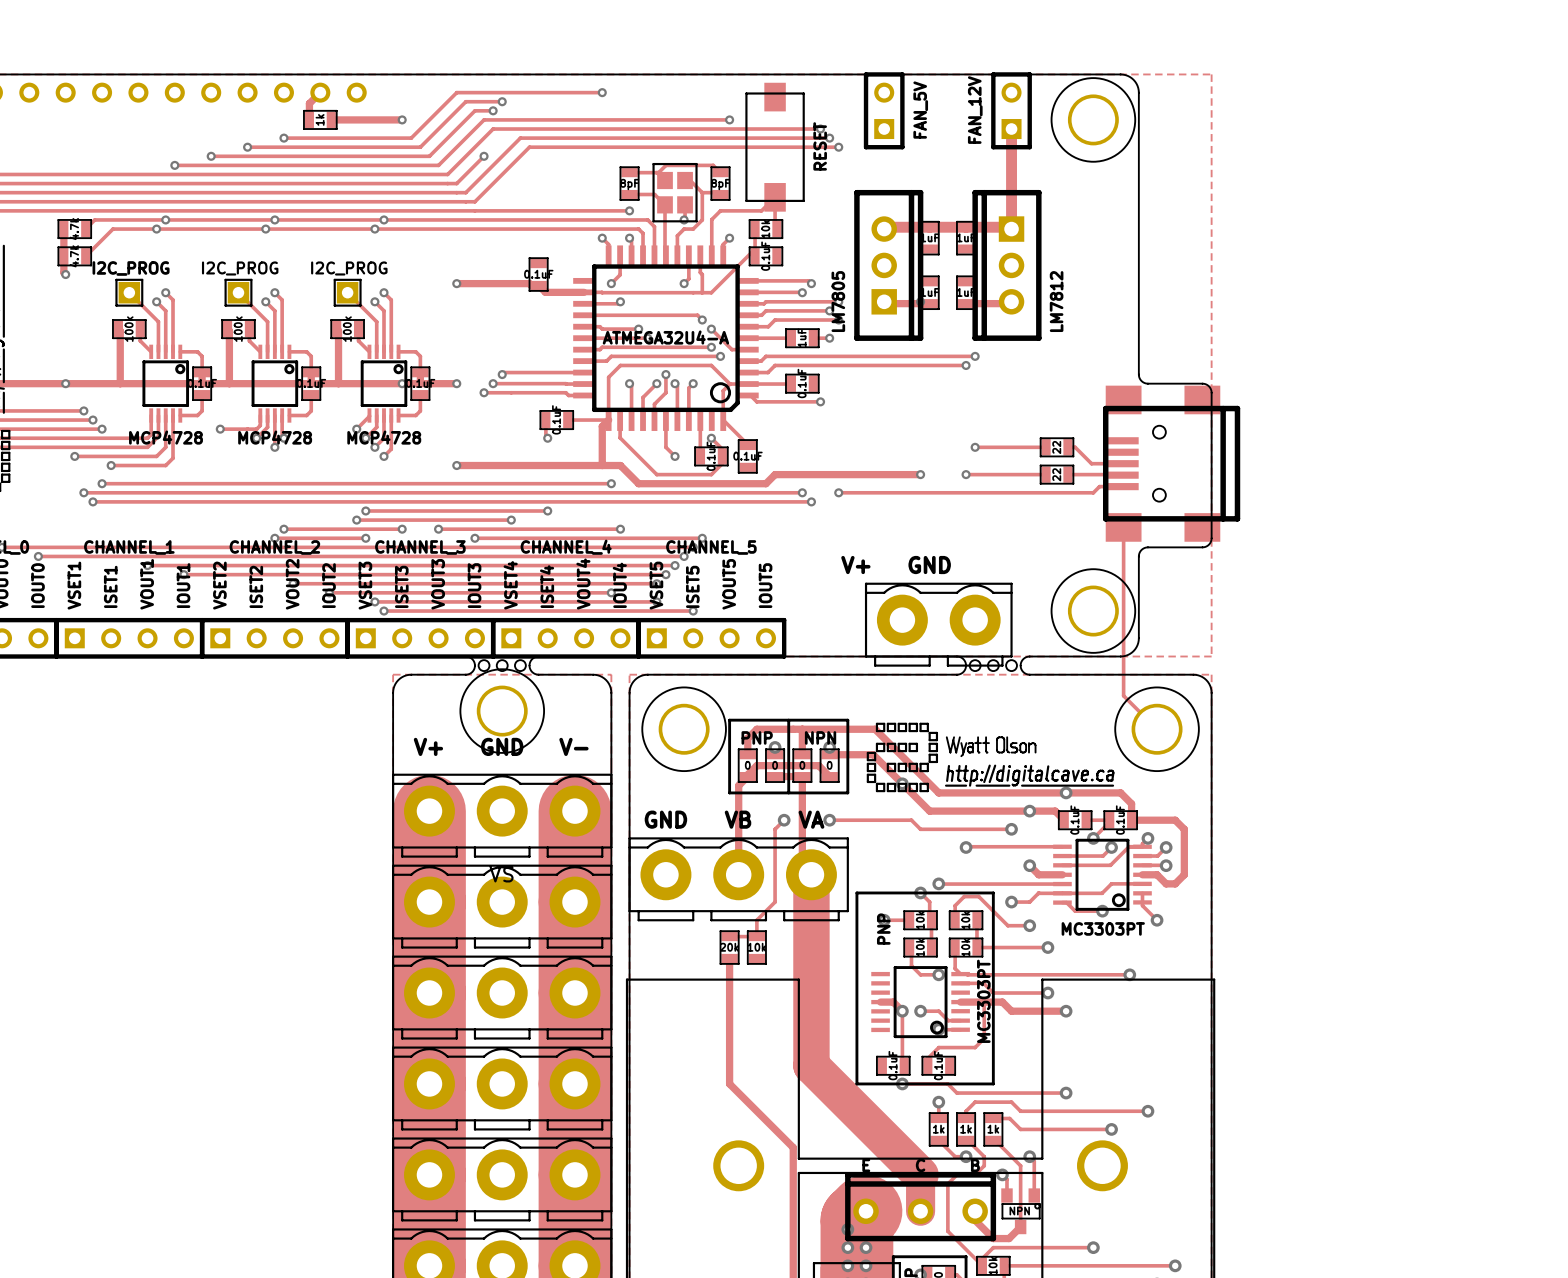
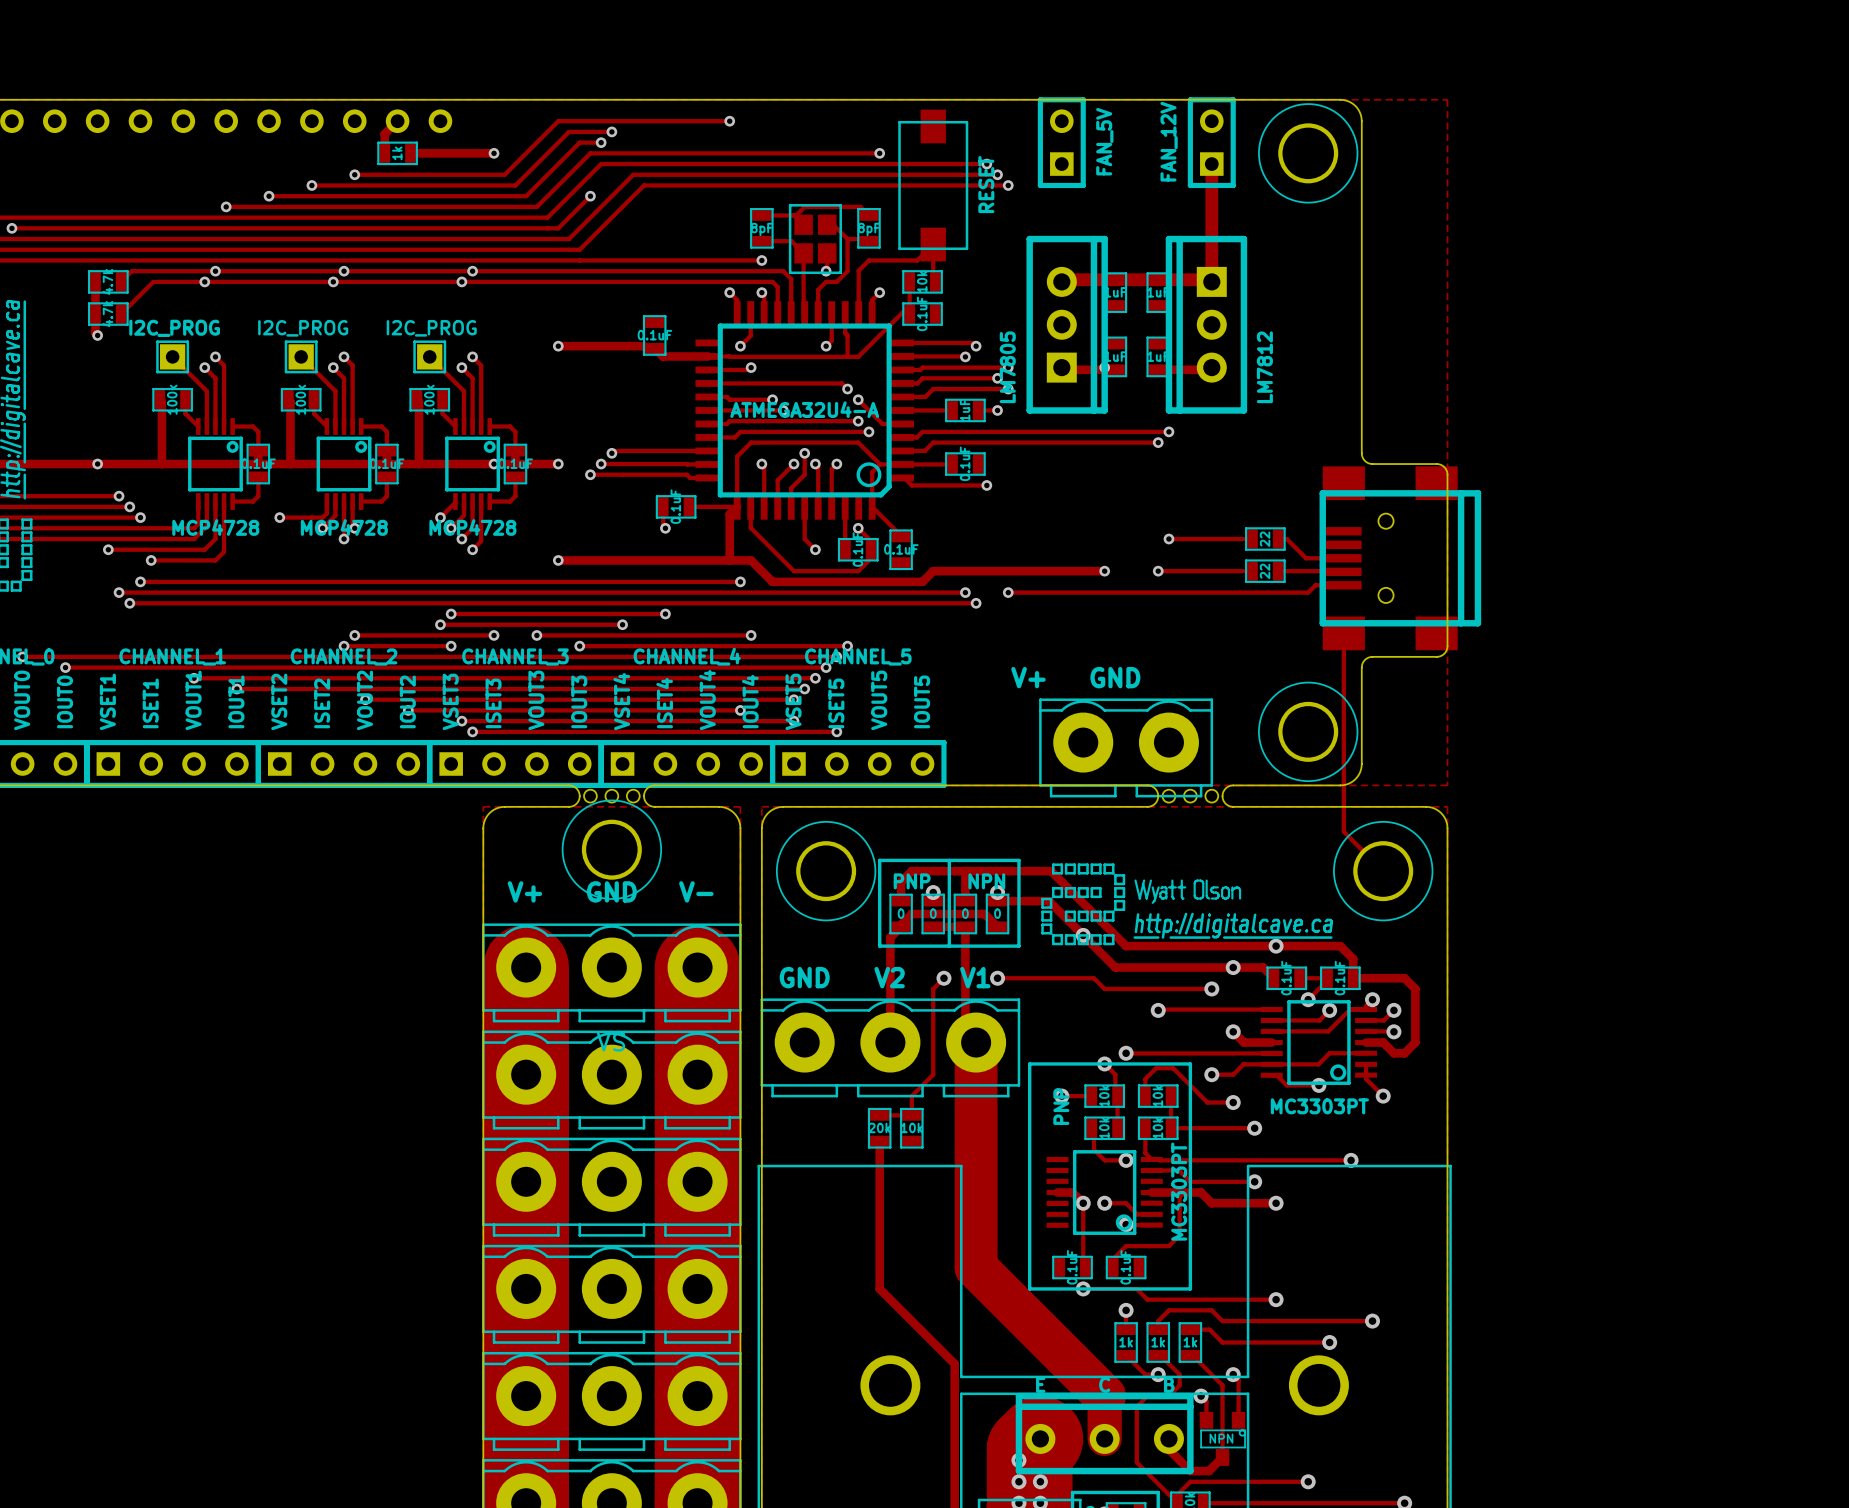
text: VB (738, 819) -> V2 (889, 977)
text: VA (811, 819) -> V1 (975, 977)

